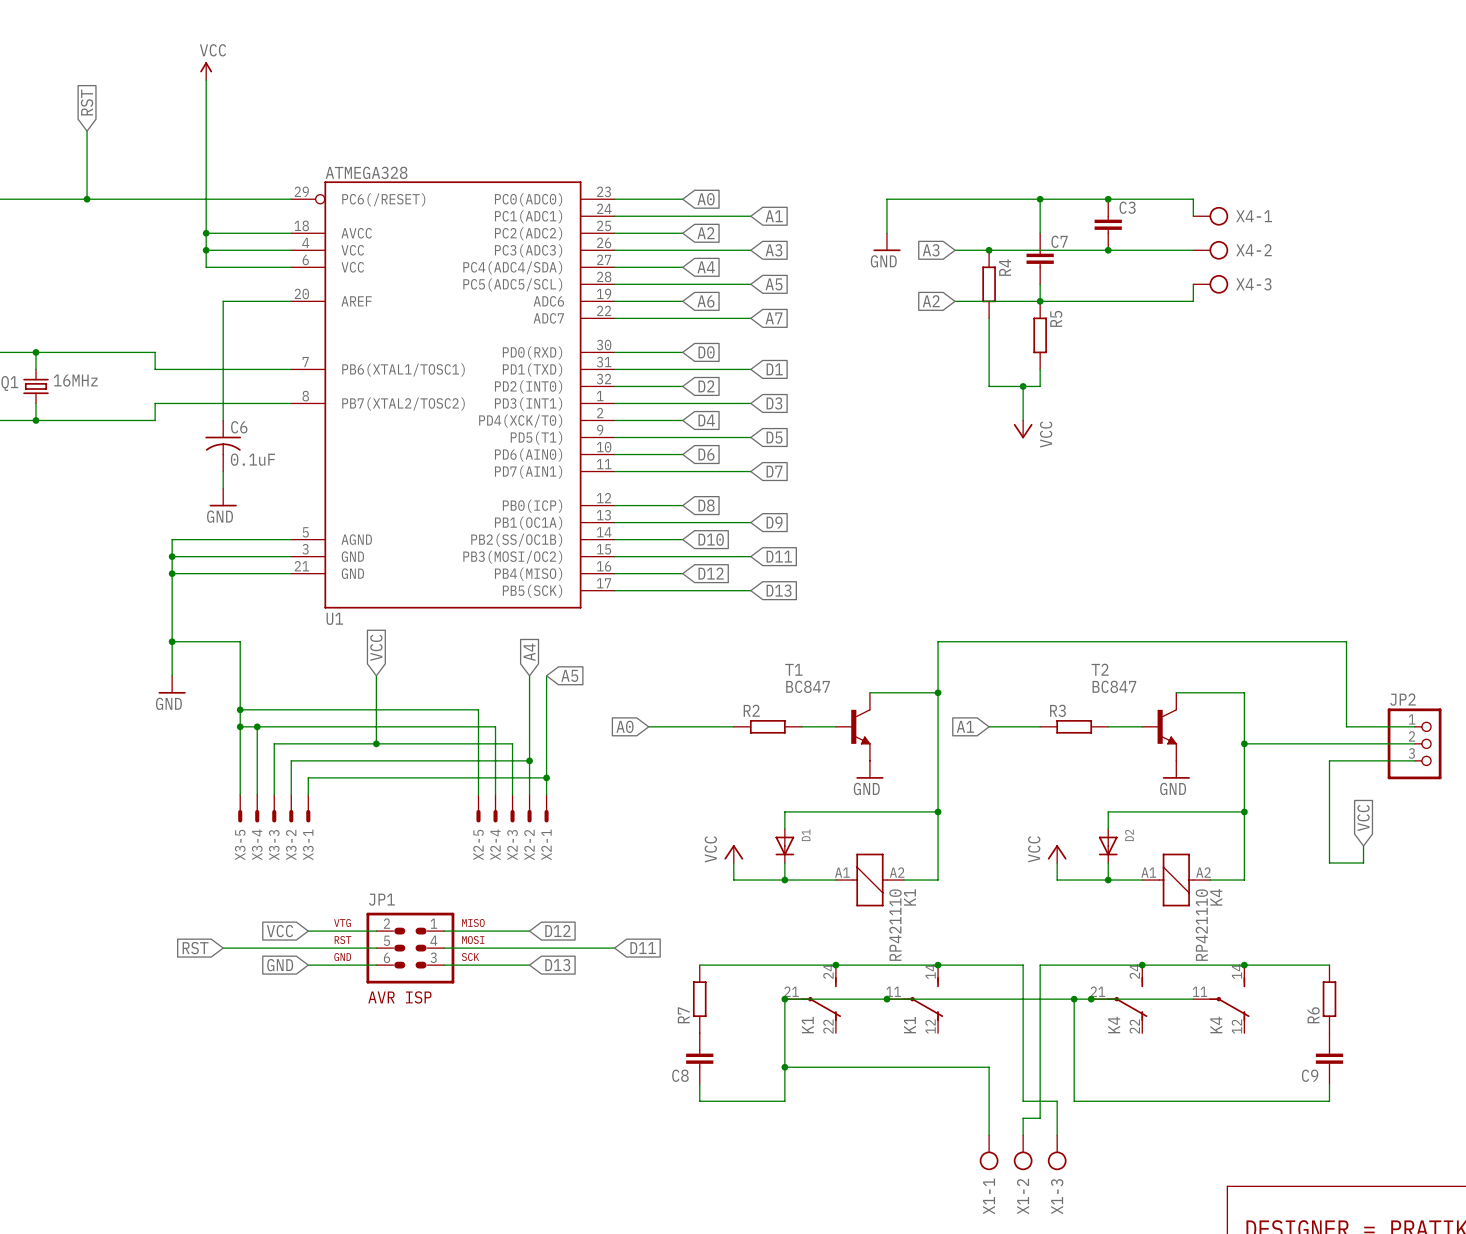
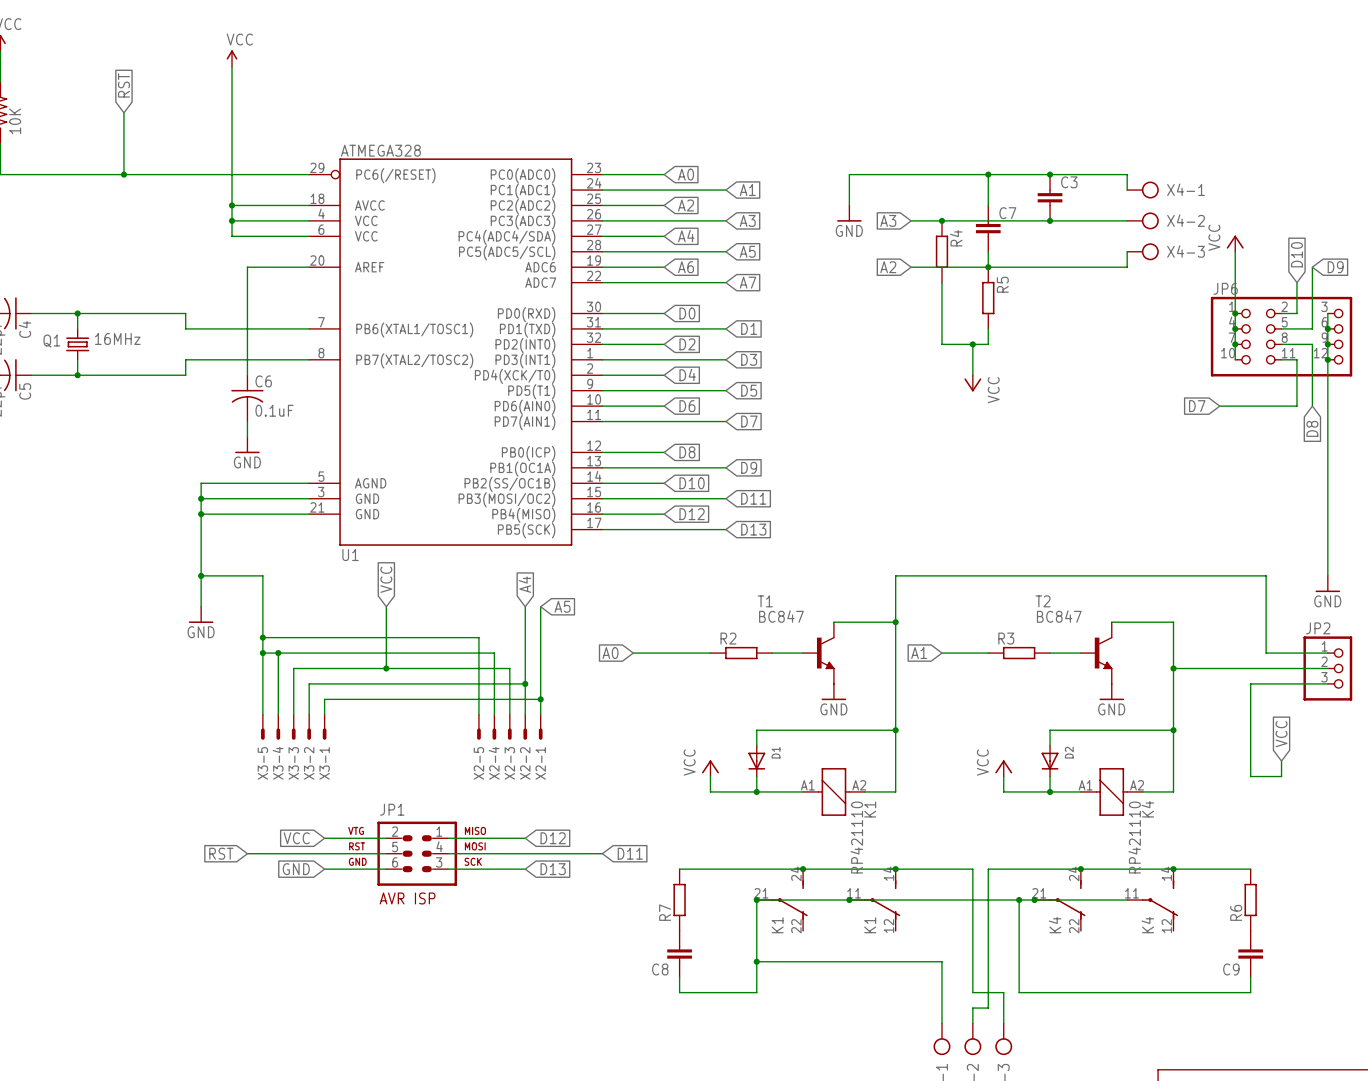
power symbol: none -> VCC (1235, 243)
wire: none -> (1235, 251) (1235, 359)
global label: none -> D10 (1296, 254)
wire: none -> (1312, 267) (1312, 328) (1281, 328)
global label: none -> D9 (1335, 267)
wire: none -> (1296, 282) (1296, 313) (1281, 313)
junction: none -> (1235, 313)
wire: none -> (1327, 313) (1327, 575)
junction: none -> (1235, 328)
junction: none -> (1327, 328)
JP6: none -> (1281, 336)
junction: none -> (1235, 344)
wire: none -> (1281, 344) (1312, 344) (1312, 406)
junction: none -> (1327, 344)
wire: none -> (1281, 359) (1296, 359) (1296, 406) (1219, 406)
junction: none -> (1327, 359)
global label: none -> D7 (1197, 406)
global label: none -> D8 (1312, 428)
power symbol: none -> GND (1327, 583)

